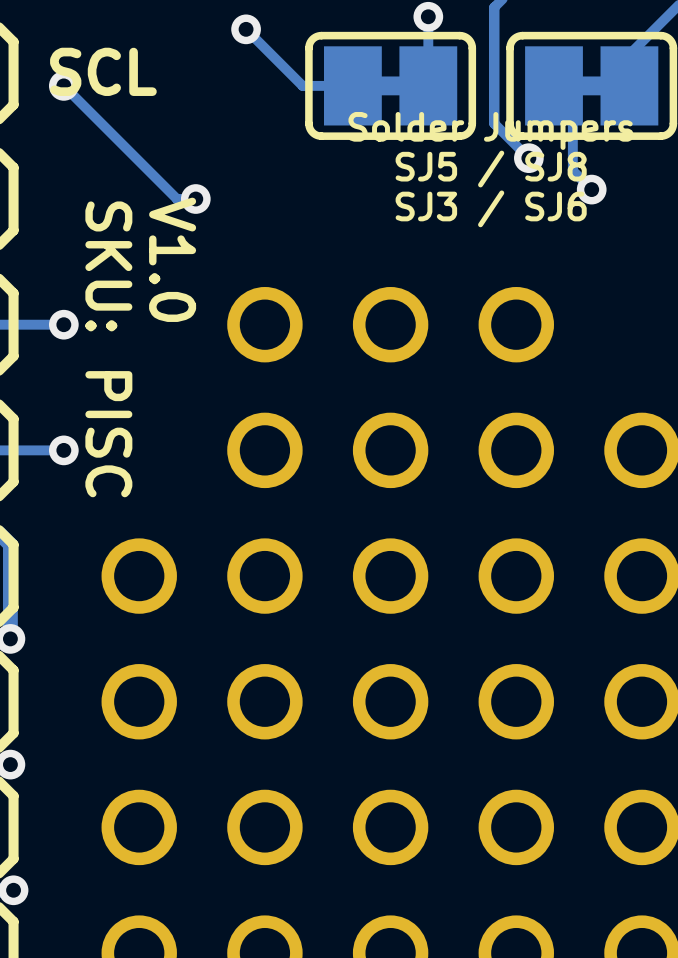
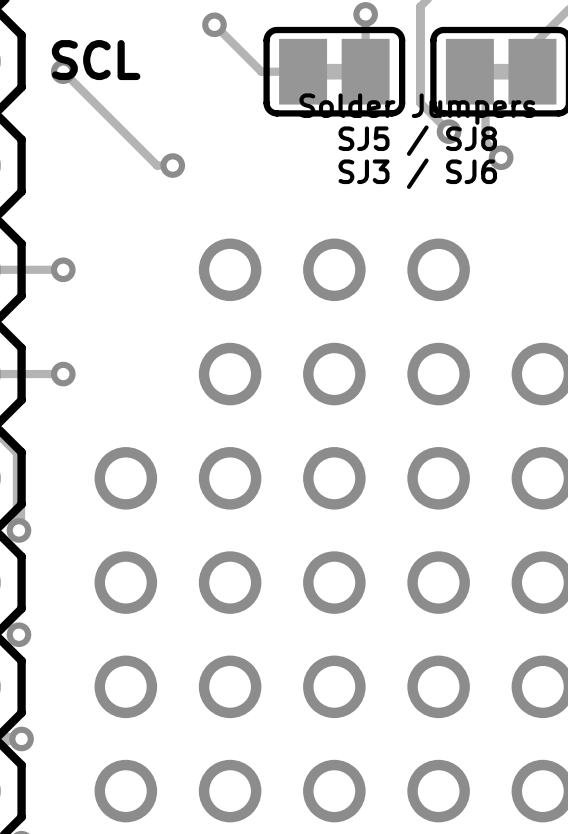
text: V1.0 (172, 259) -> none
text: SKU: PISC (108, 349) -> none

